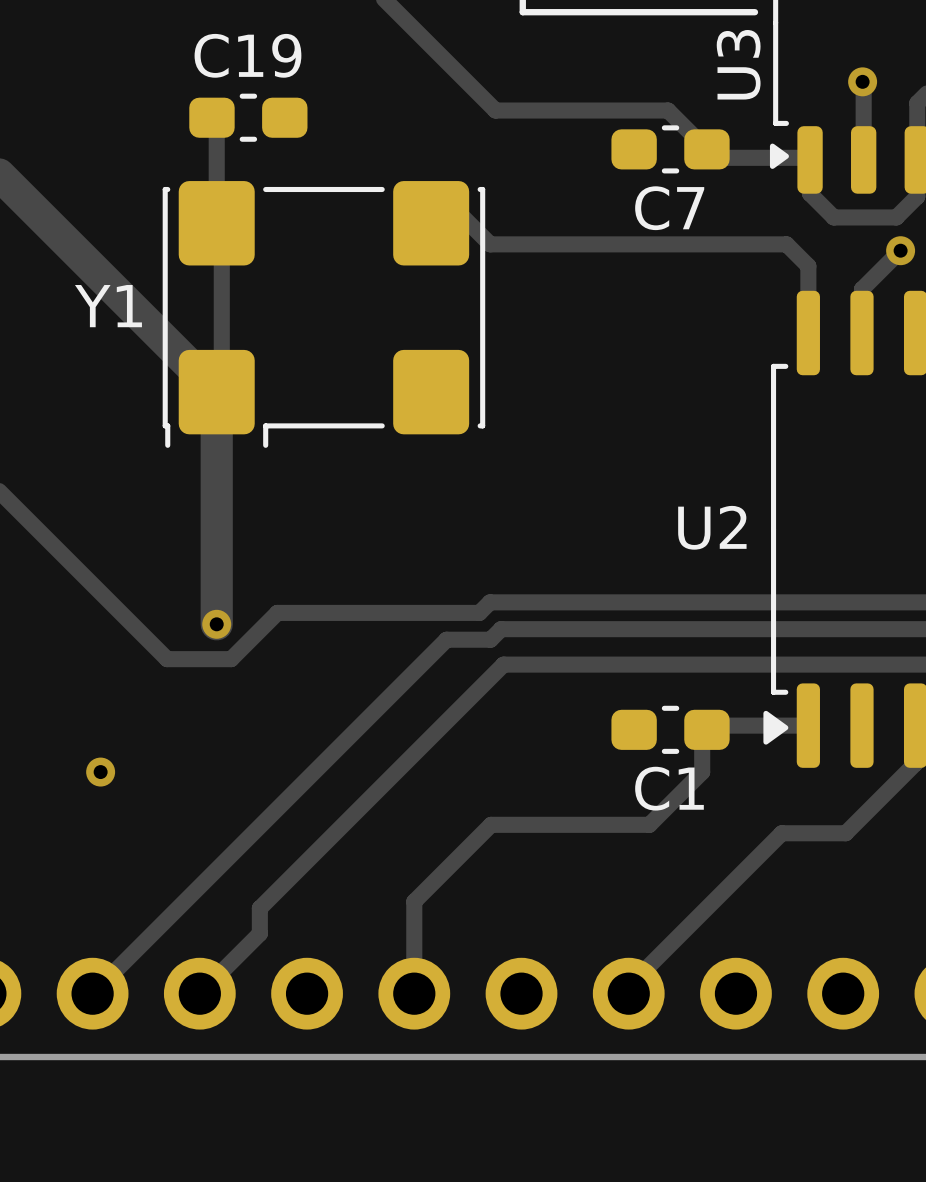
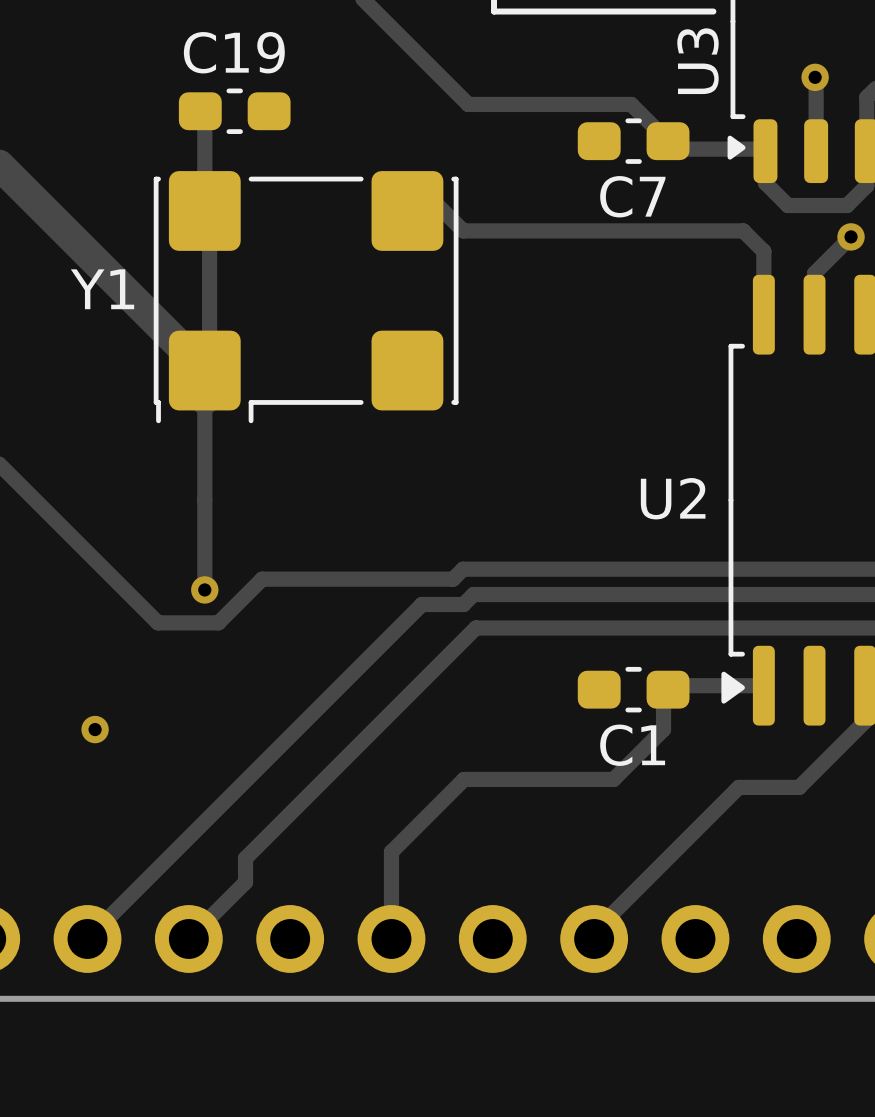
track width: thick (216, 422) (216, 624) -> thin (204, 399) (204, 589)

